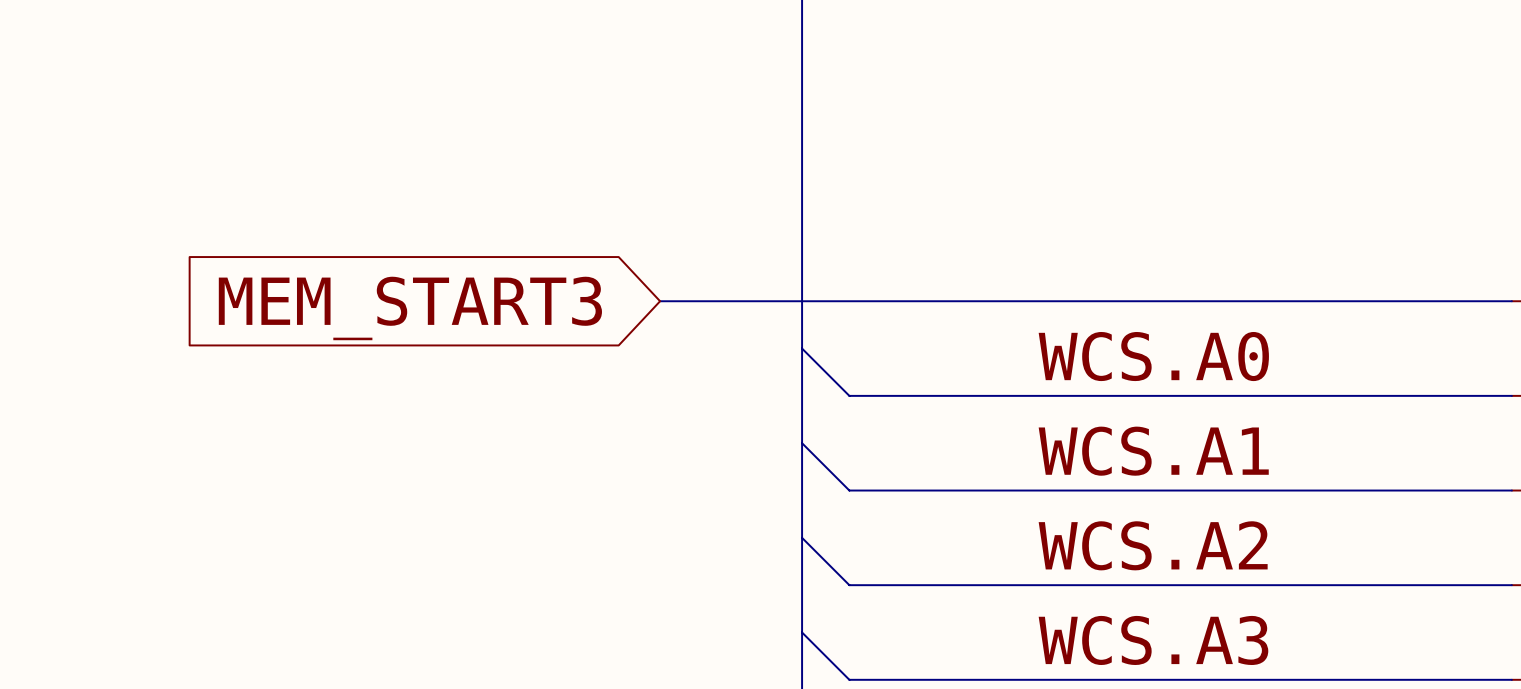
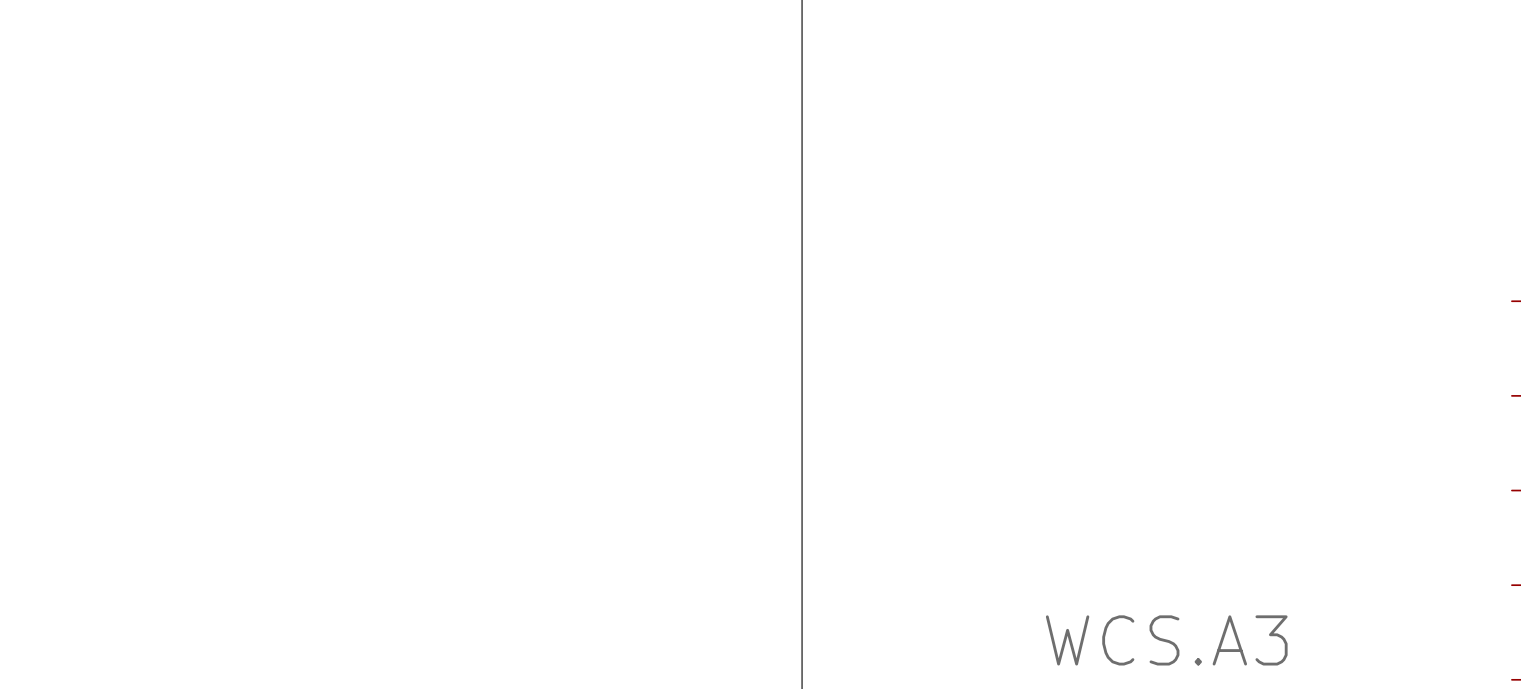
wire: (660, 301) (1511, 301) -> none
global label: MEM_START3 (410, 308) -> none
wire: (802, 348) (849, 395) (1511, 395) -> none
label: WCS.A0 (1153, 356) -> none
wire: (802, 443) (849, 490) (1511, 490) -> none
label: WCS.A1 (1153, 451) -> none
wire: (802, 537) (849, 585) (1511, 585) -> none
label: WCS.A2 (1153, 545) -> none
wire: (802, 632) (849, 679) (1511, 679) -> none

